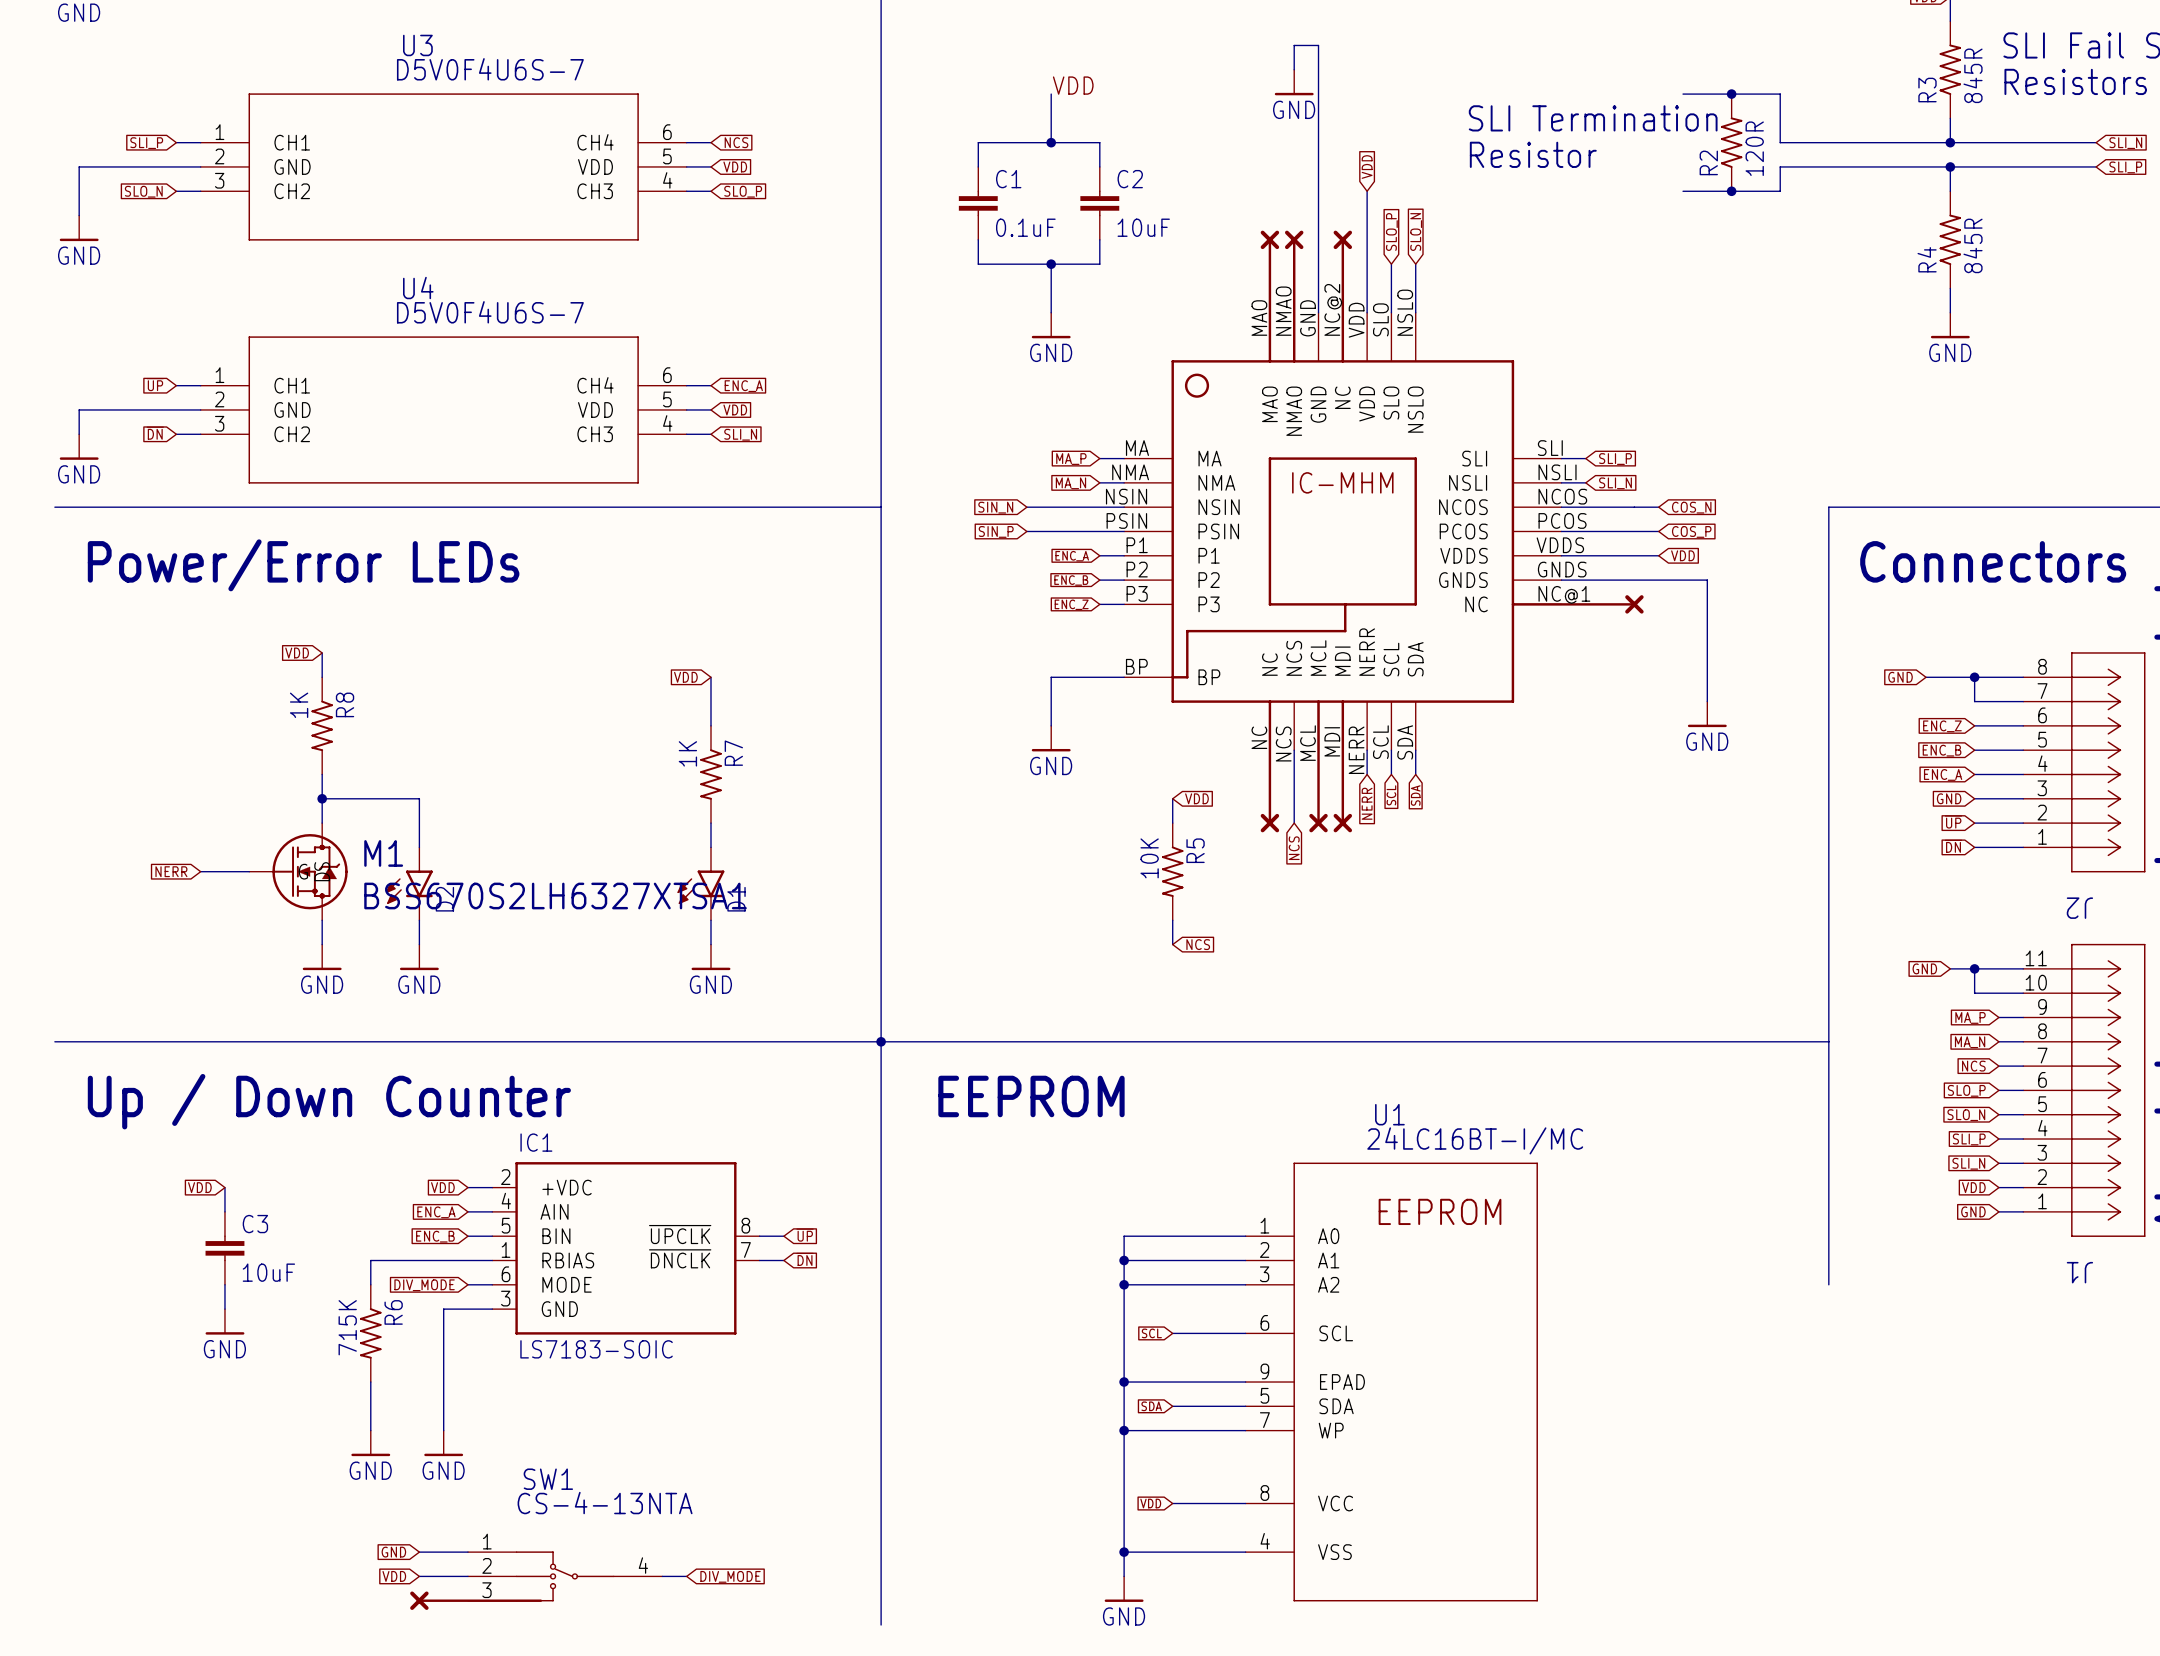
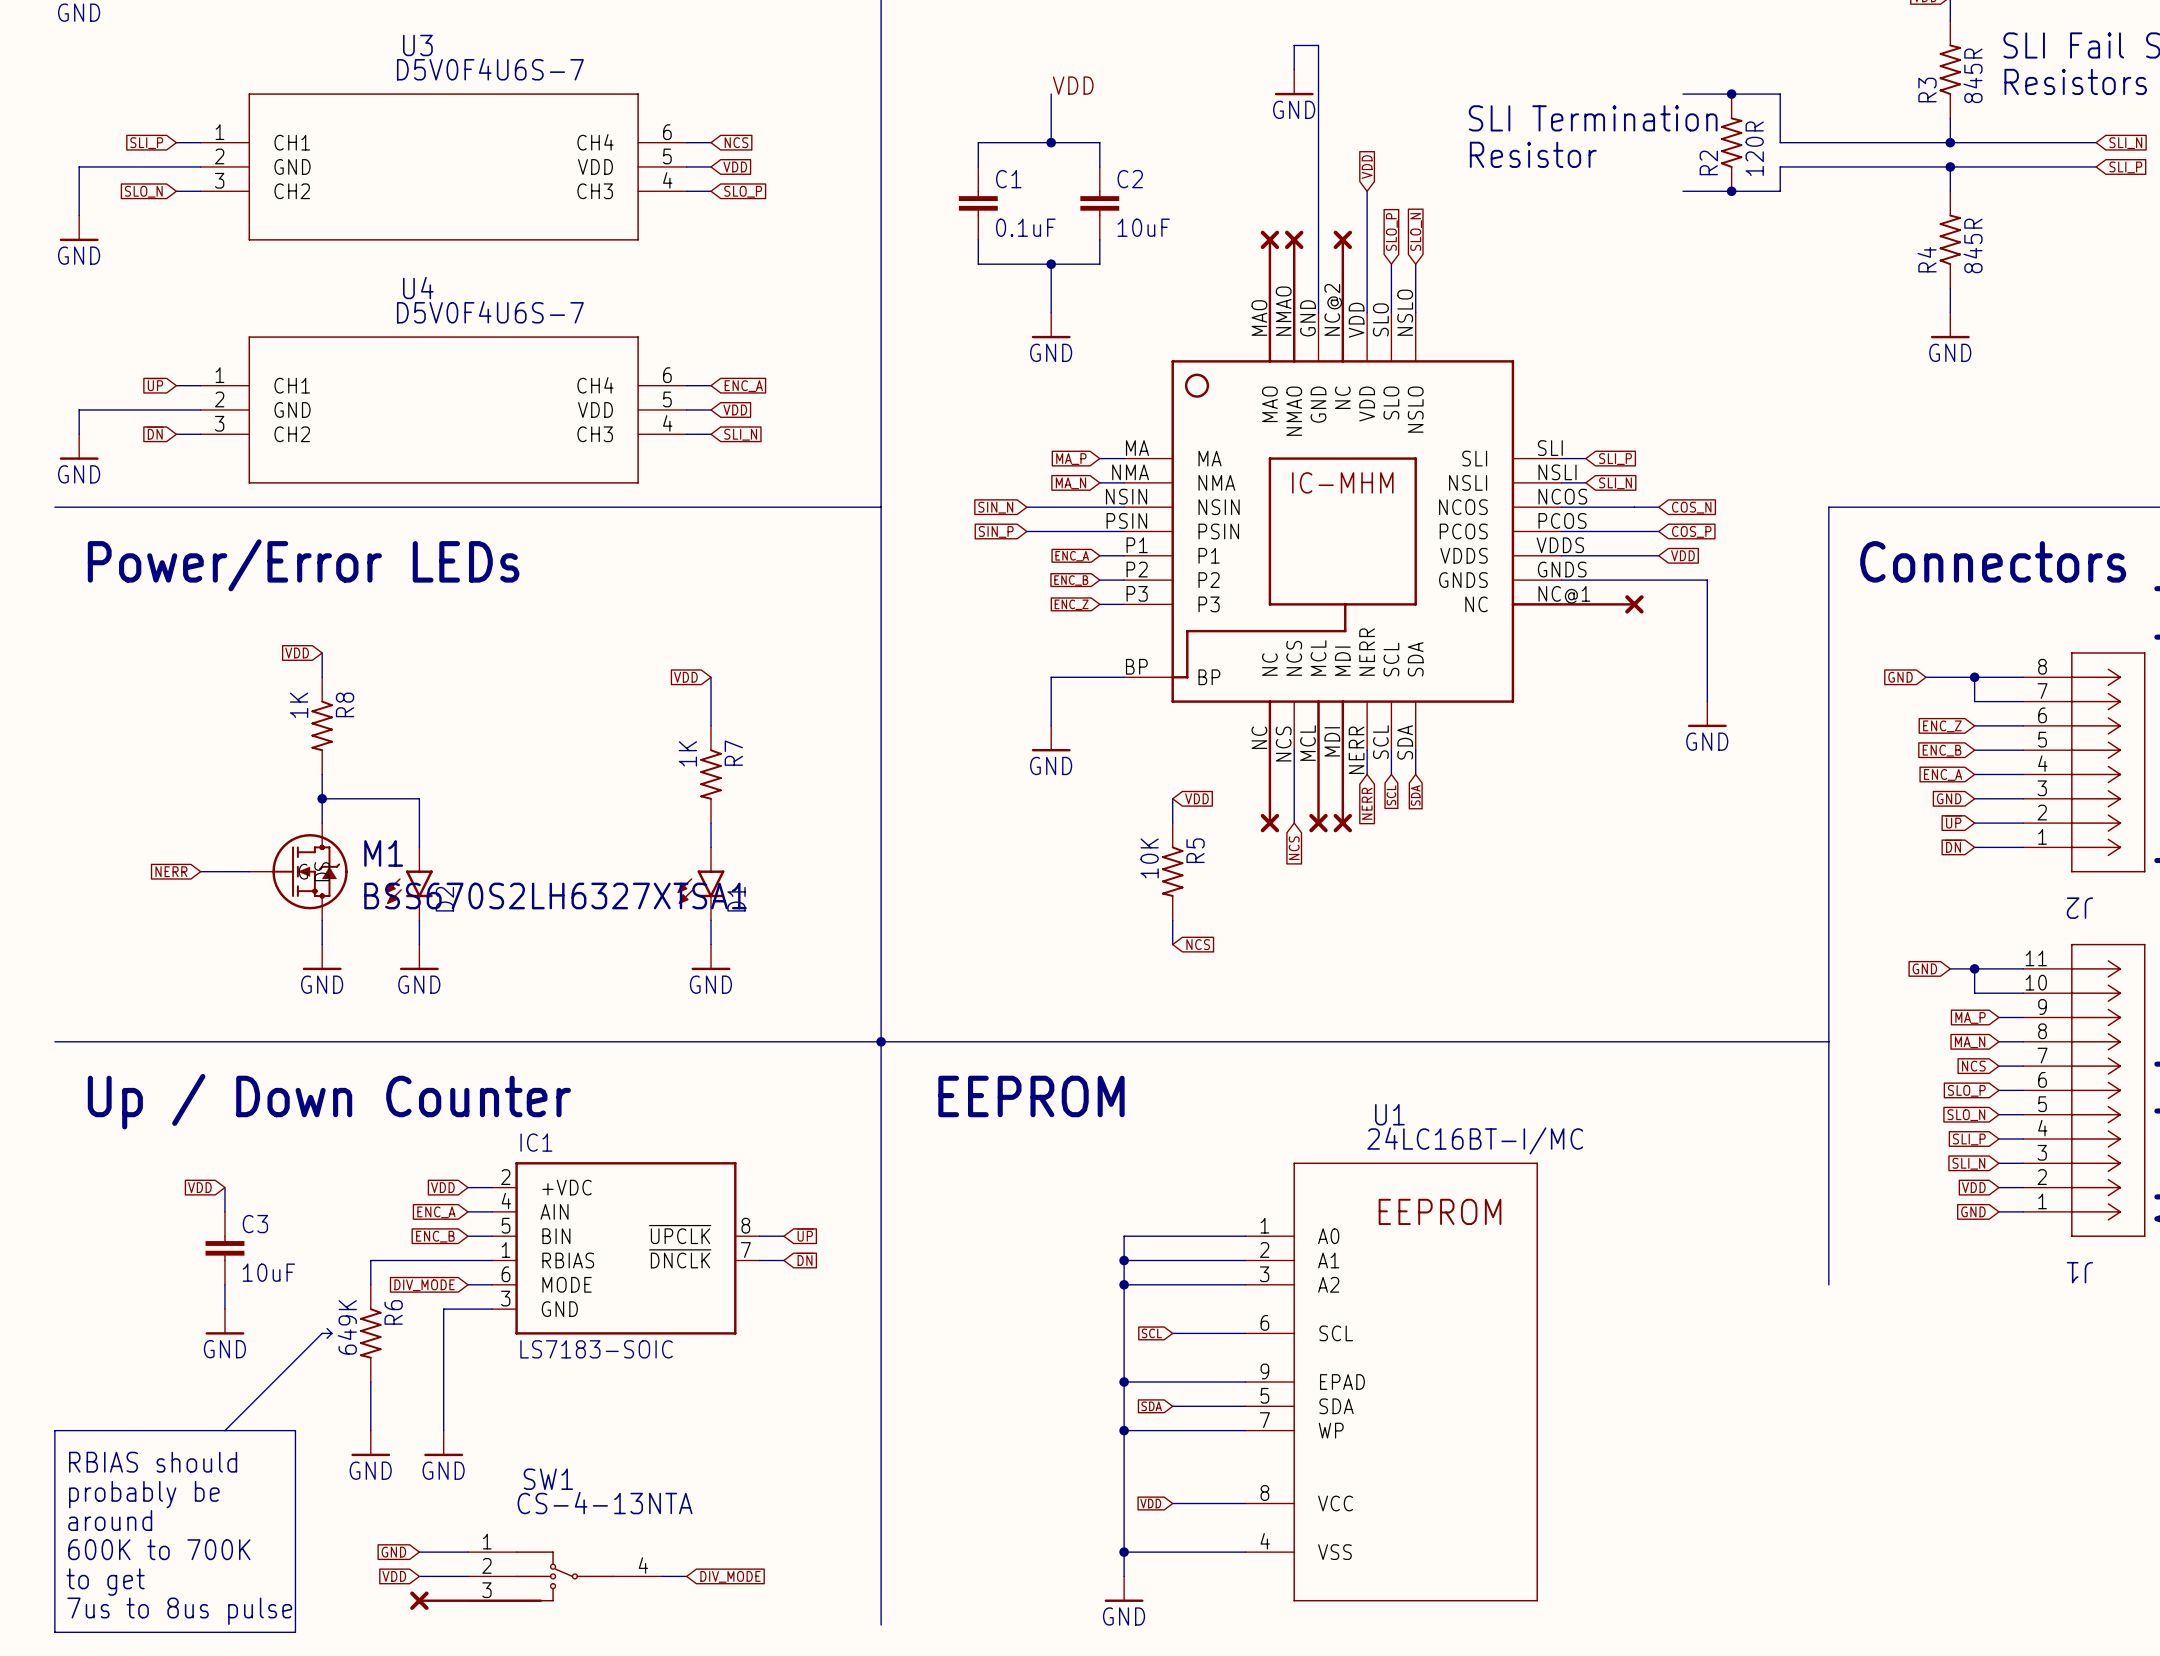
R6 value: 715K (347, 1327) -> 649K (347, 1327)
wire: none -> (327, 1328) (331, 1333)
wire: none -> (331, 1333) (322, 1333) (224, 1430)
wire: none -> (331, 1333) (327, 1338)
wire: none -> (54, 1430) (295, 1430) (295, 1632) (54, 1632) (54, 1430)
text: none -> RBIAS should (153, 1462)
text: none -> probably be (144, 1494)
text: none -> around (110, 1520)
text: none -> 600K to 700K (159, 1549)
text: none -> to get (105, 1582)
text: none -> 7us to 8us pulse (179, 1611)

